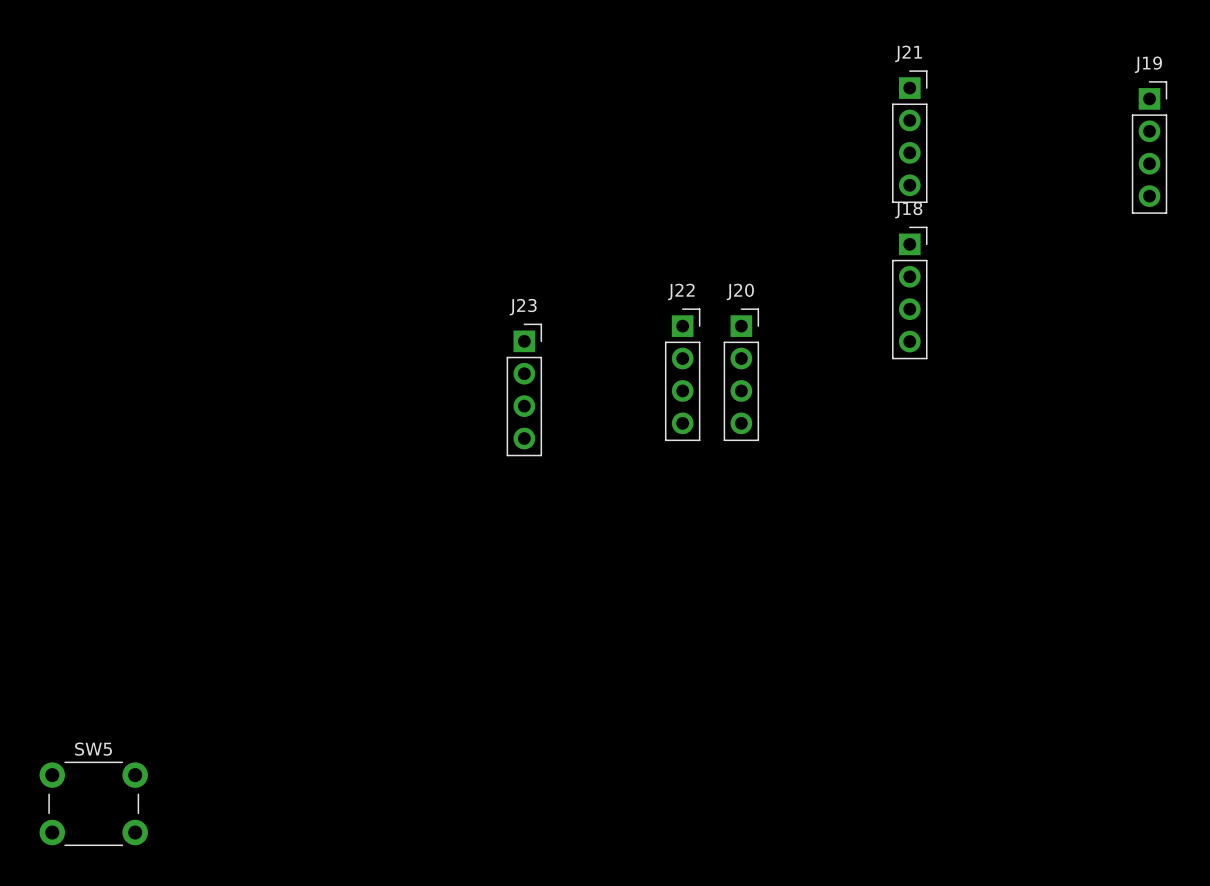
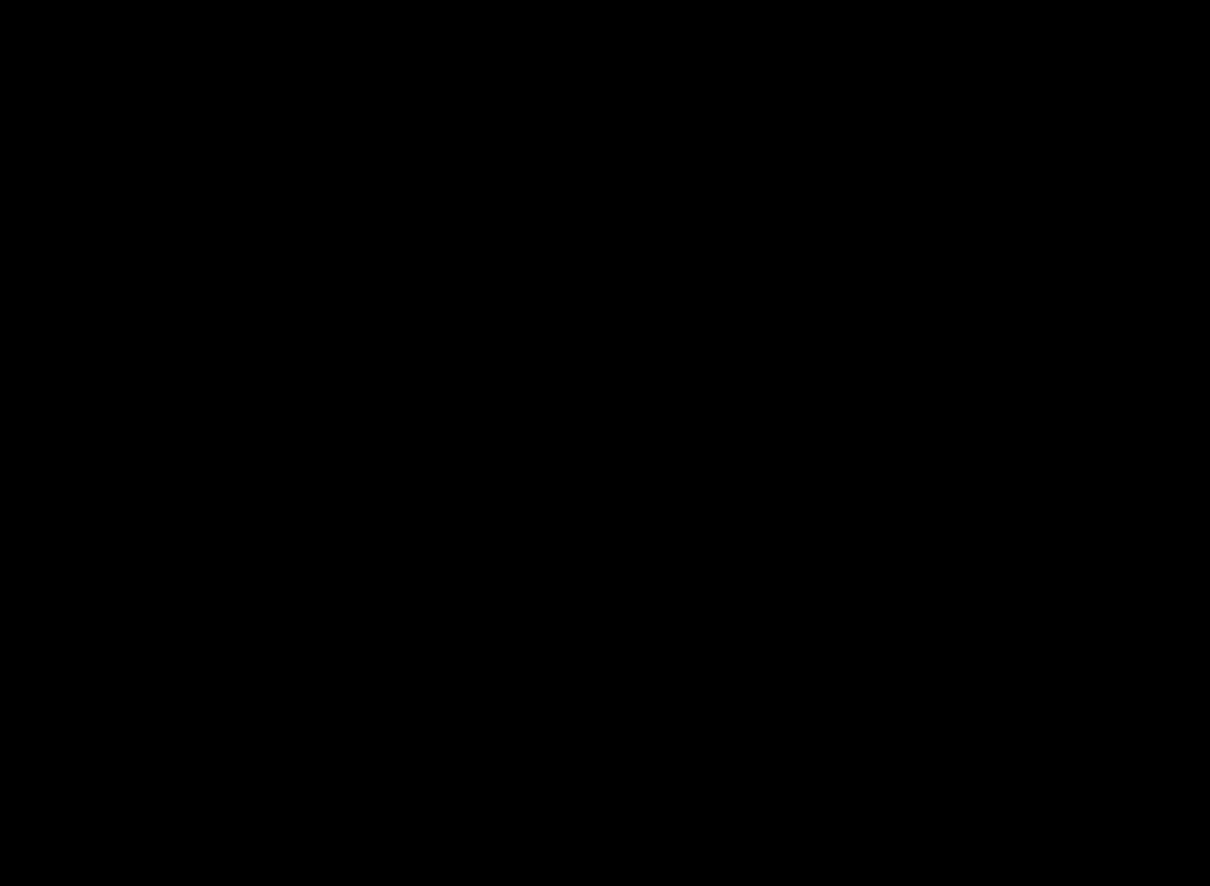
J21: (909, 136) -> none
J19: (1149, 147) -> none
J18: (909, 292) -> none
J22: (682, 374) -> none
J20: (741, 374) -> none
J23: (524, 389) -> none
SW5: (93, 803) -> none

